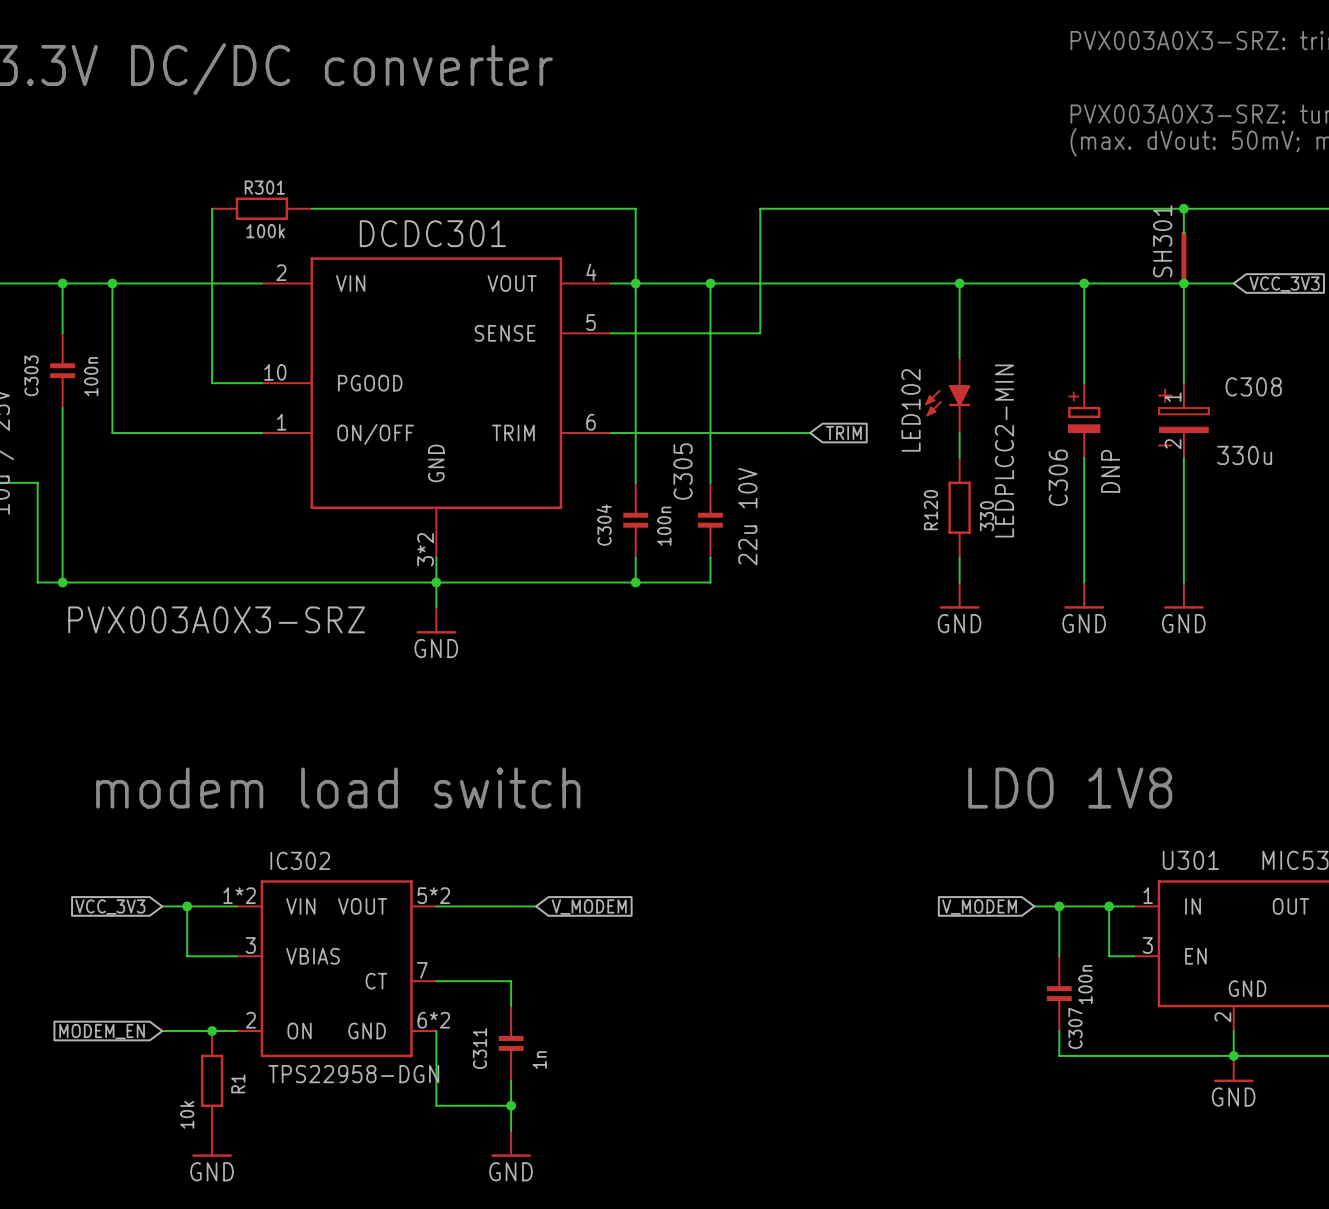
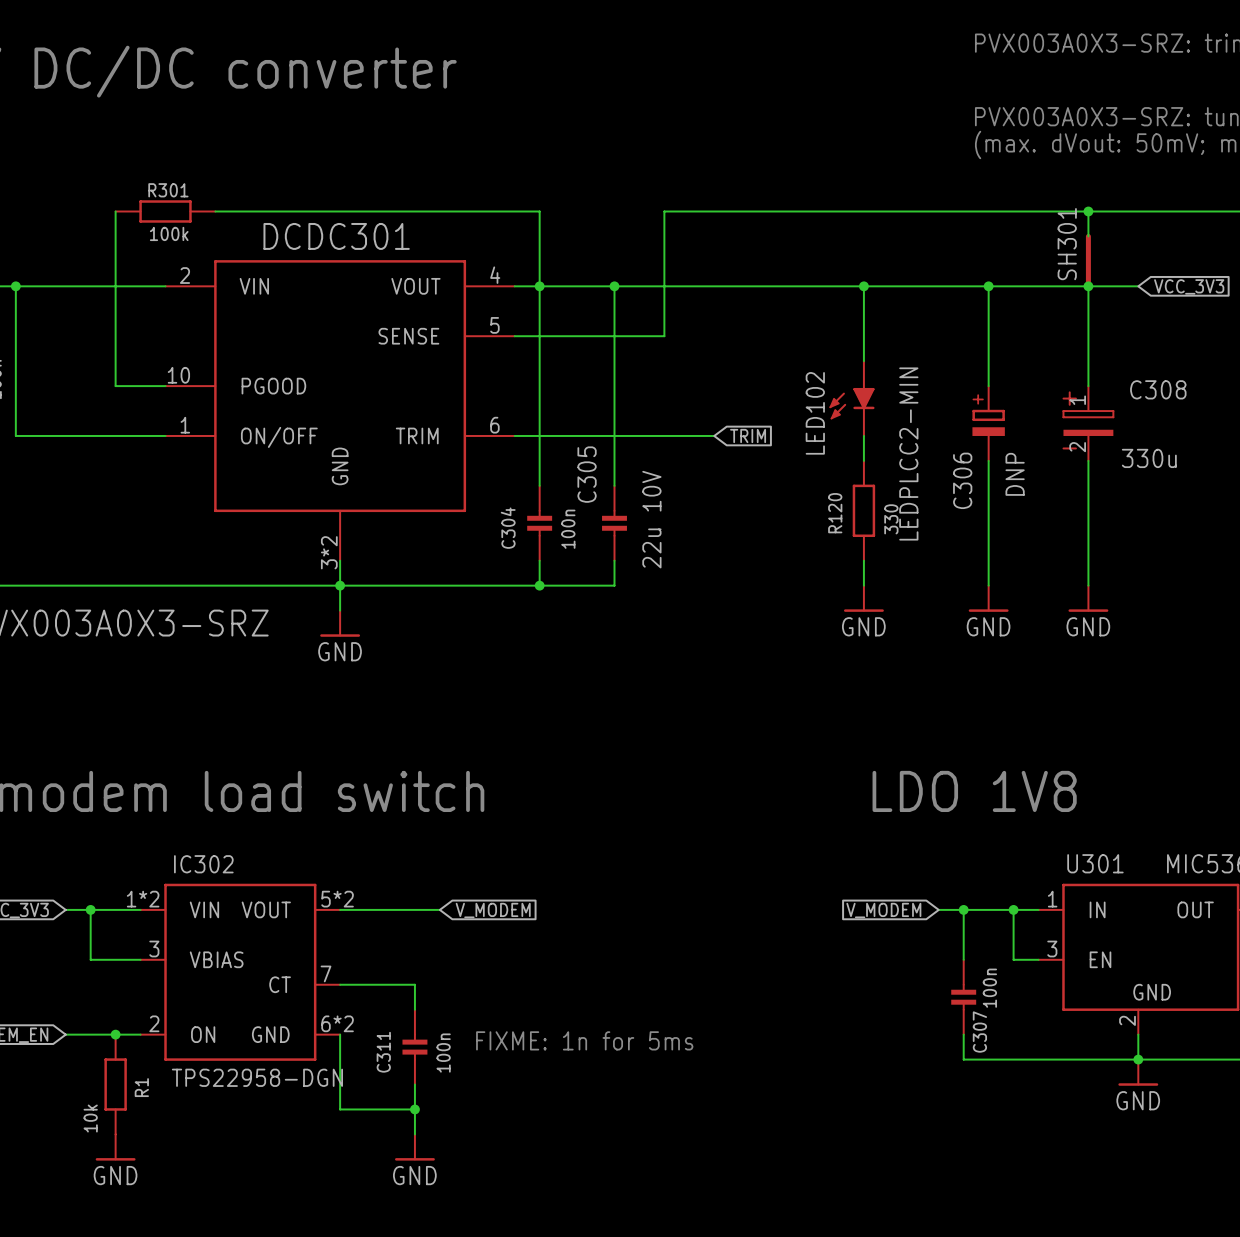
text: none -> FIXME: 1n for 5ms (584, 1040)
C311 value: 1n (539, 1060) -> 100n (443, 1053)

